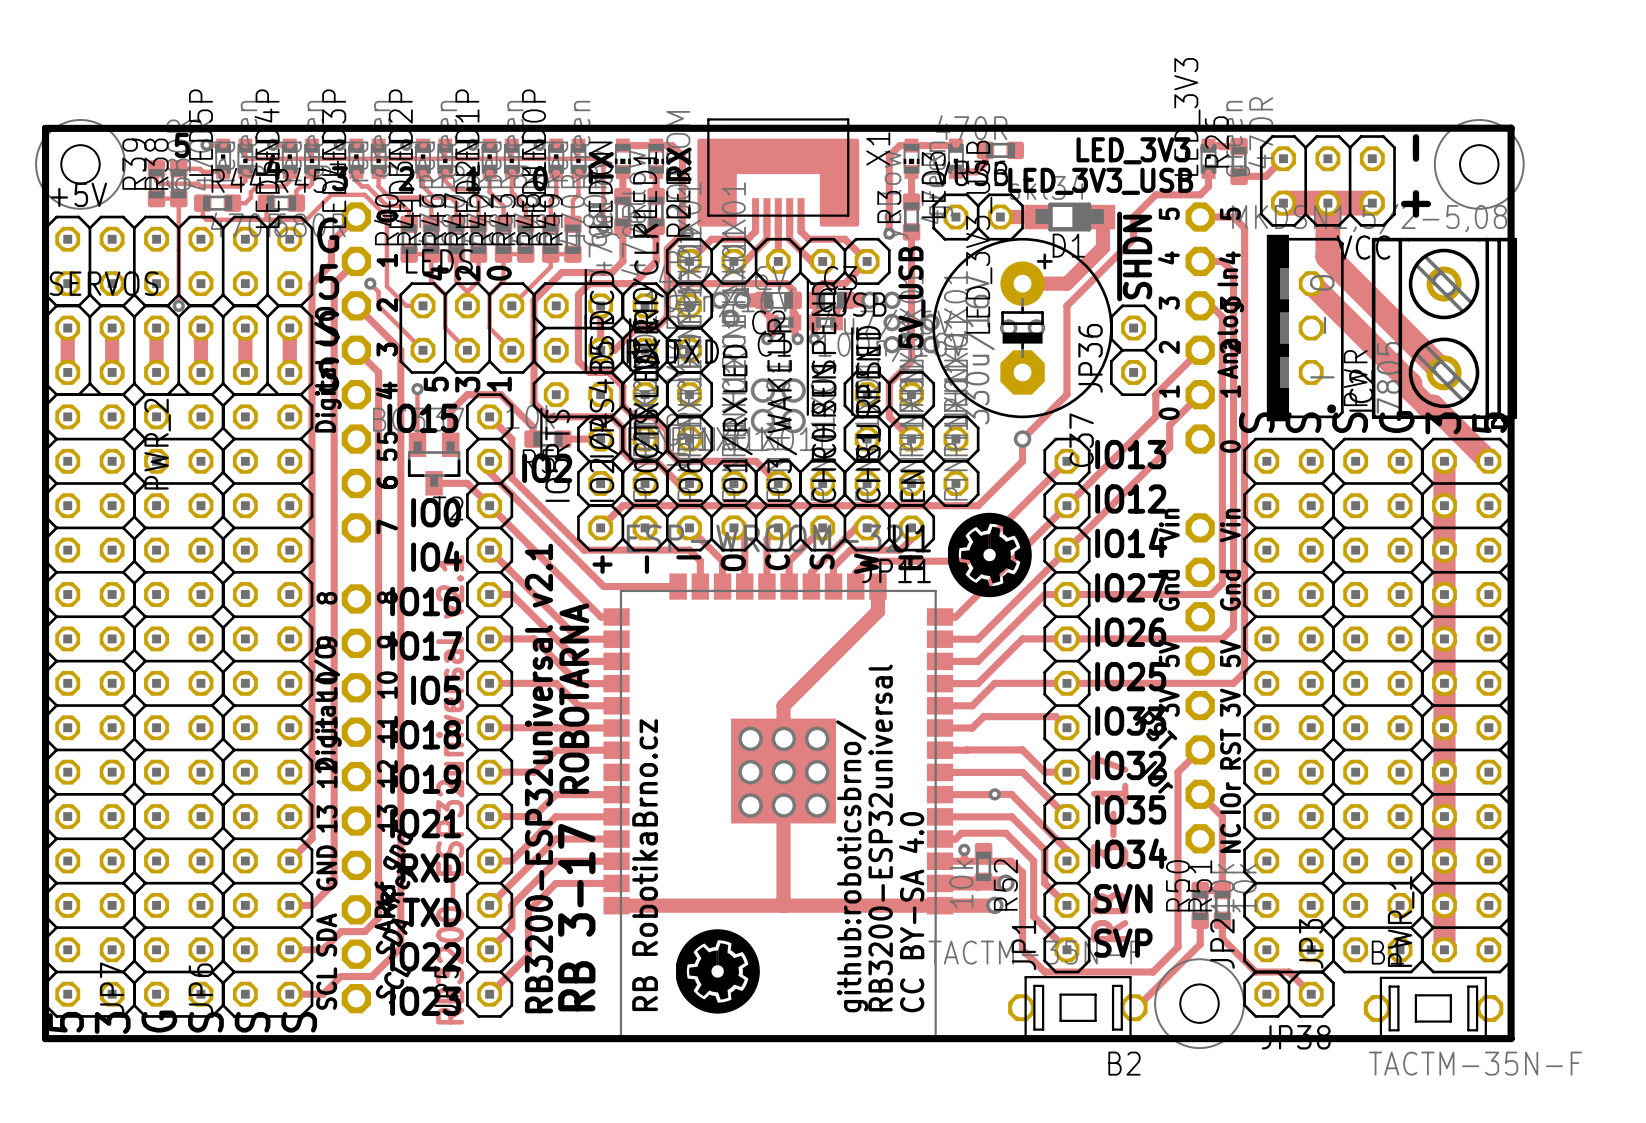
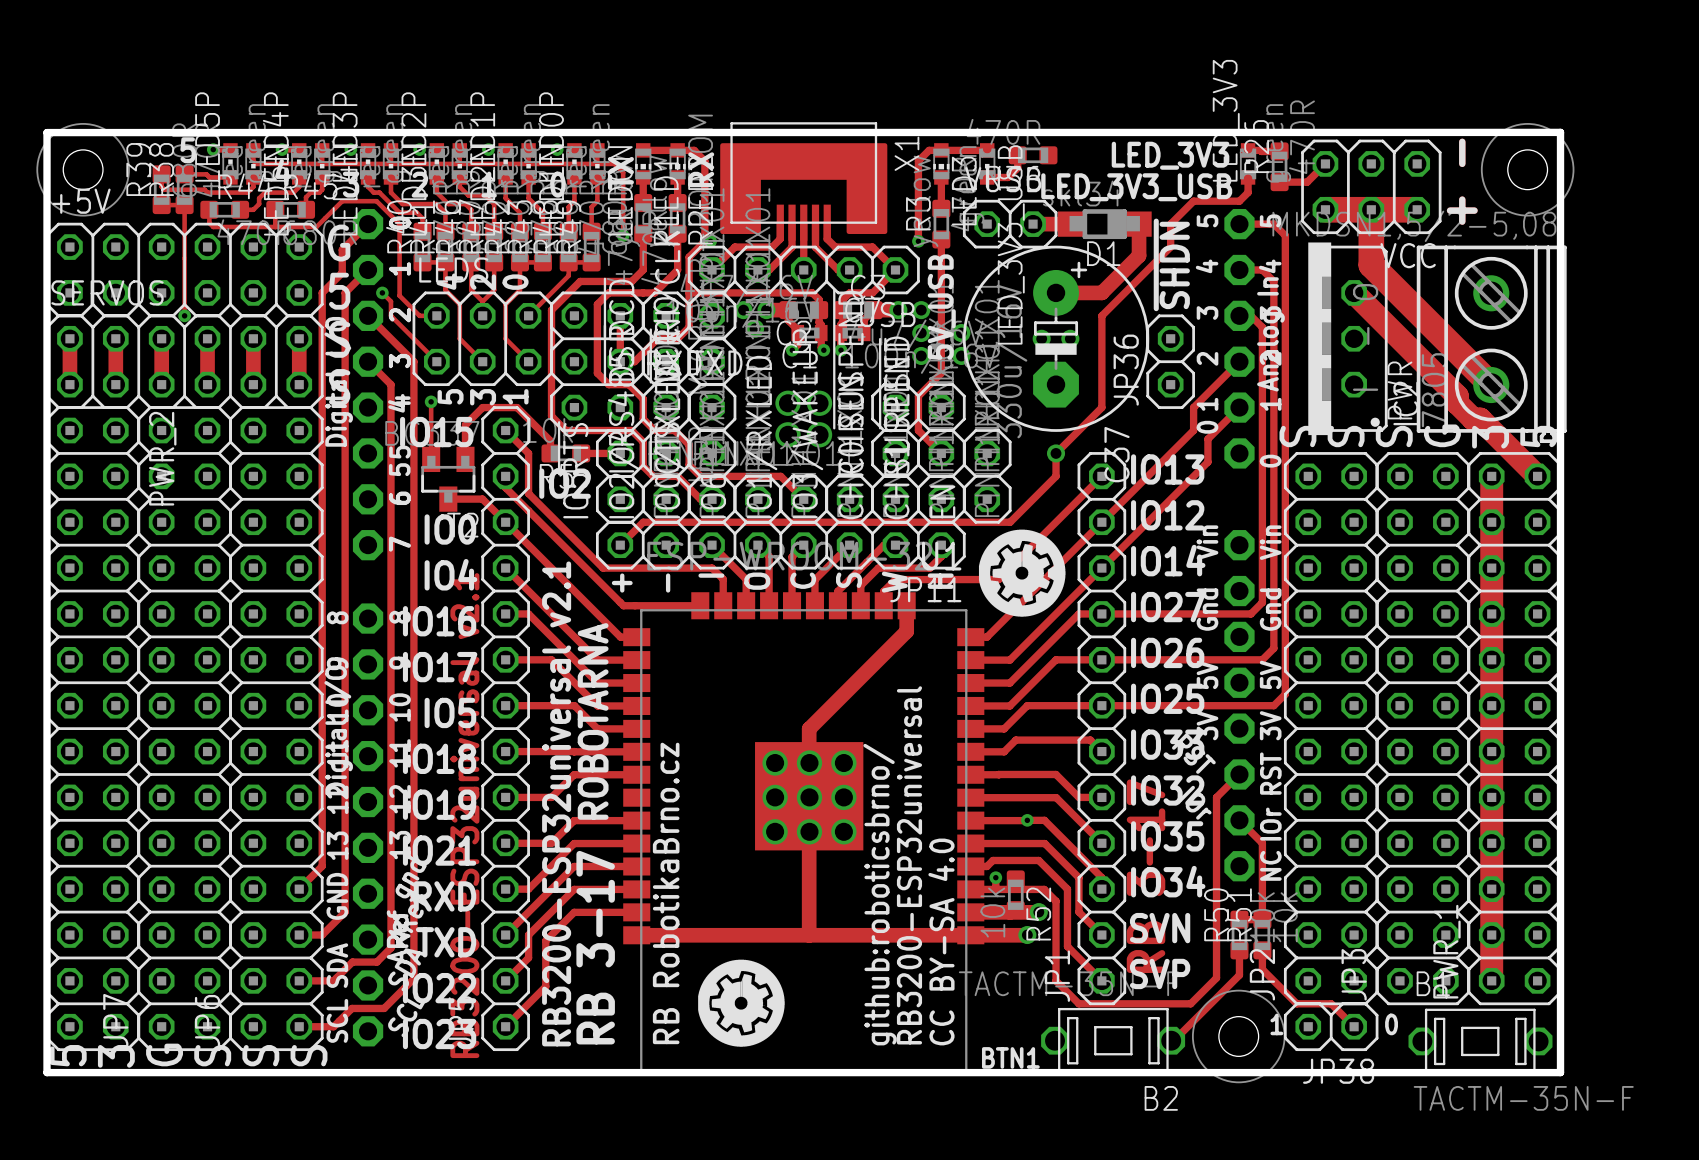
text: none -> 1 (1276, 1024)
text: none -> 0 (1391, 1024)
text: none -> BTN1 (1010, 1057)

